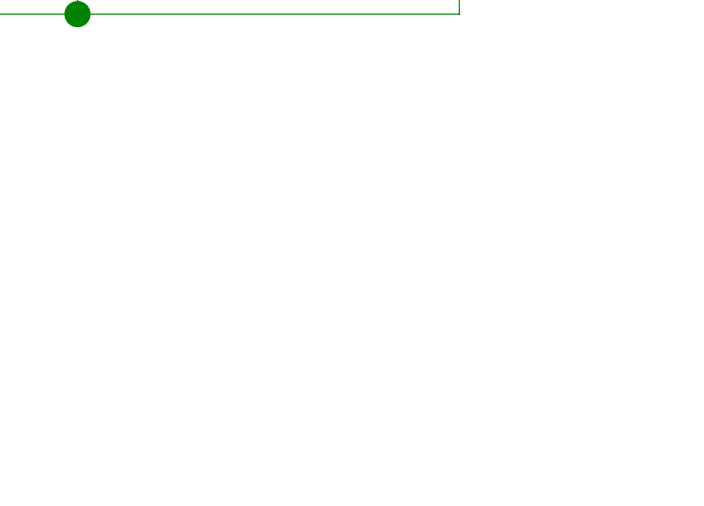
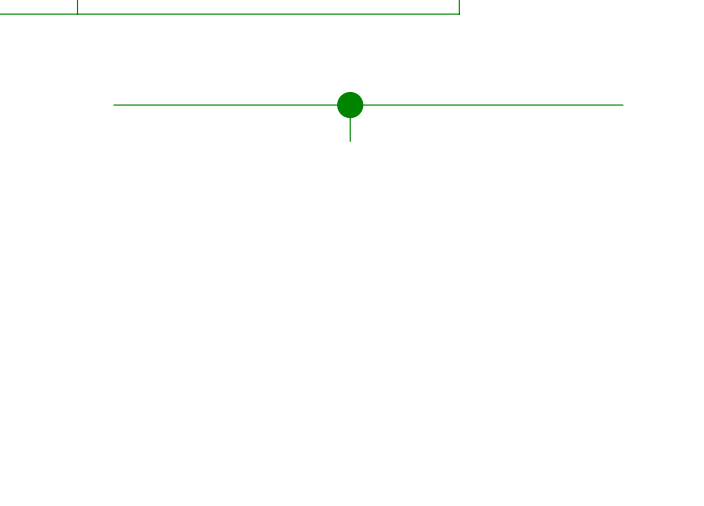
junction: (77, 14) -> none
wire: none -> (113, 105) (622, 105)
wire: none -> (350, 105) (350, 141)
junction: none -> (350, 105)

